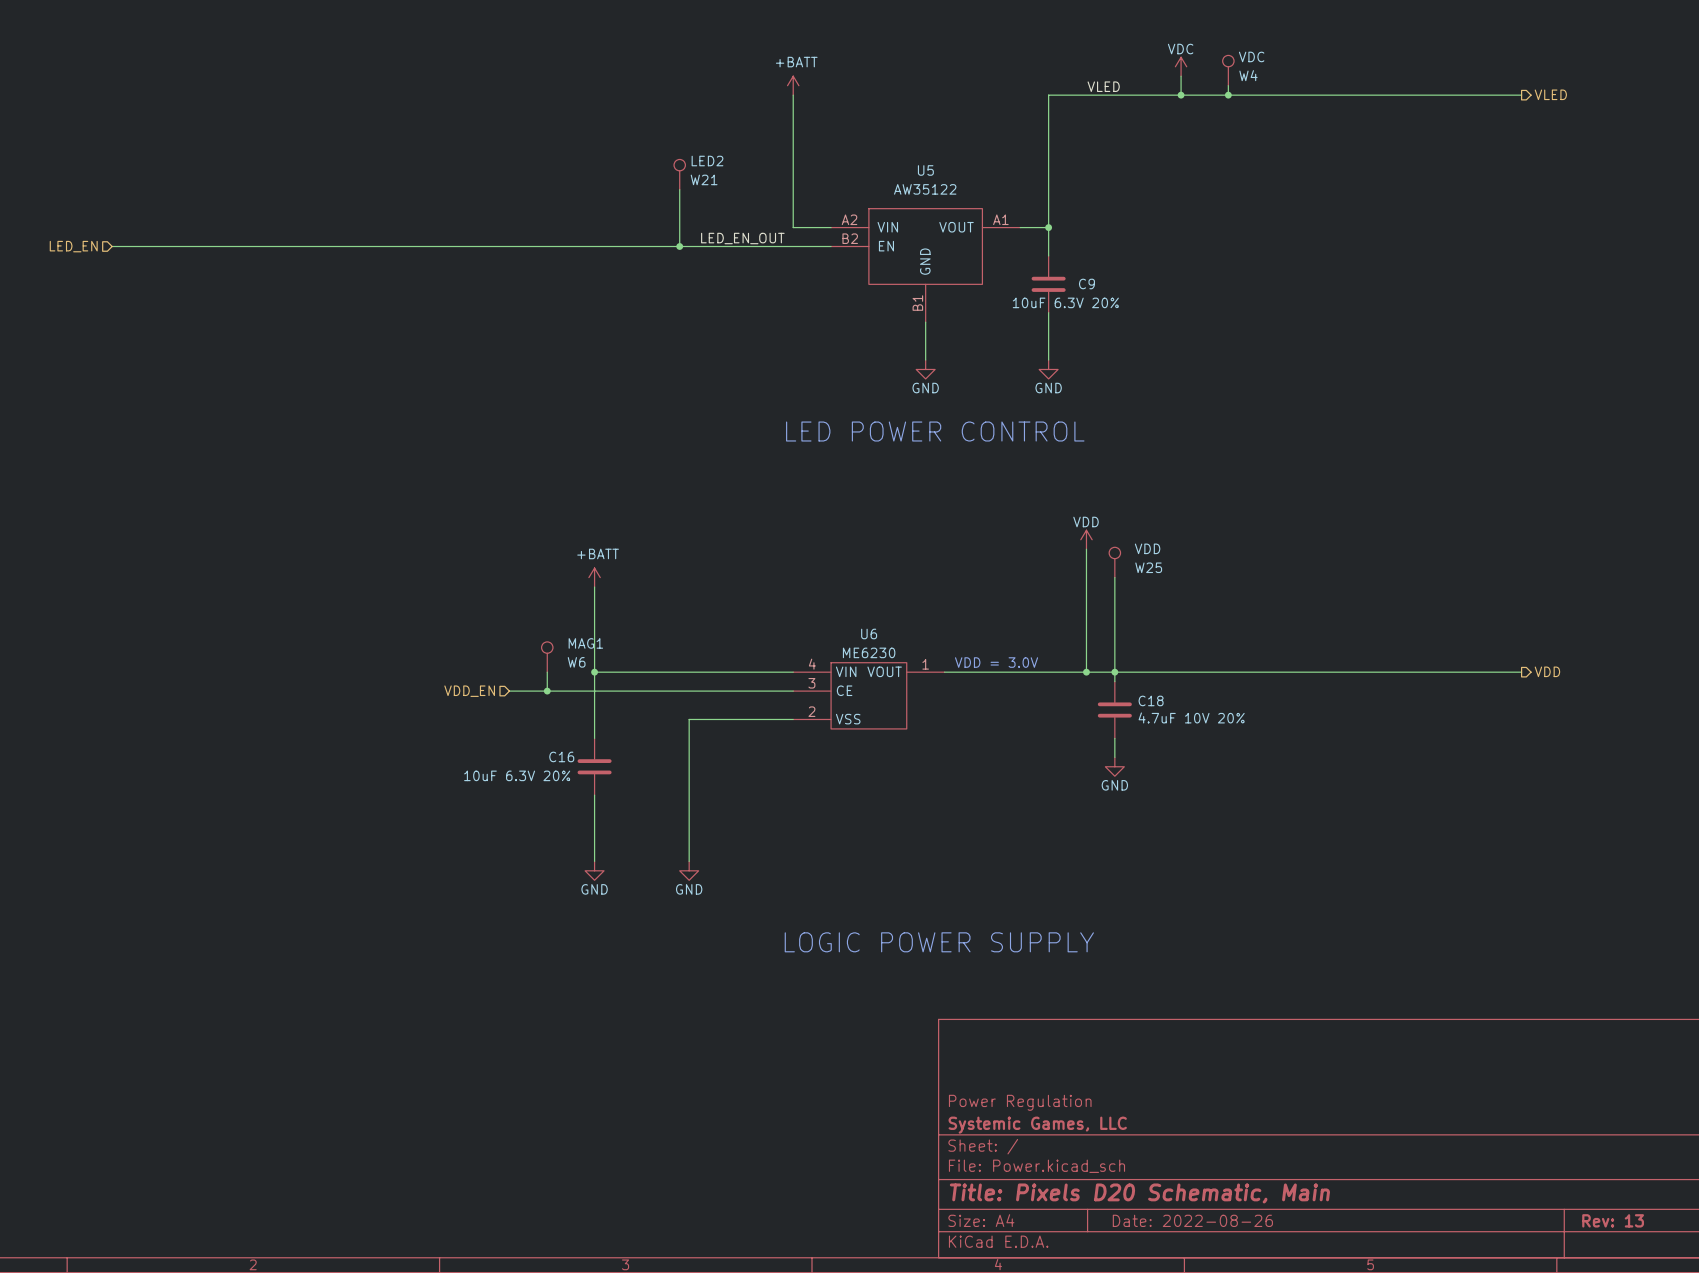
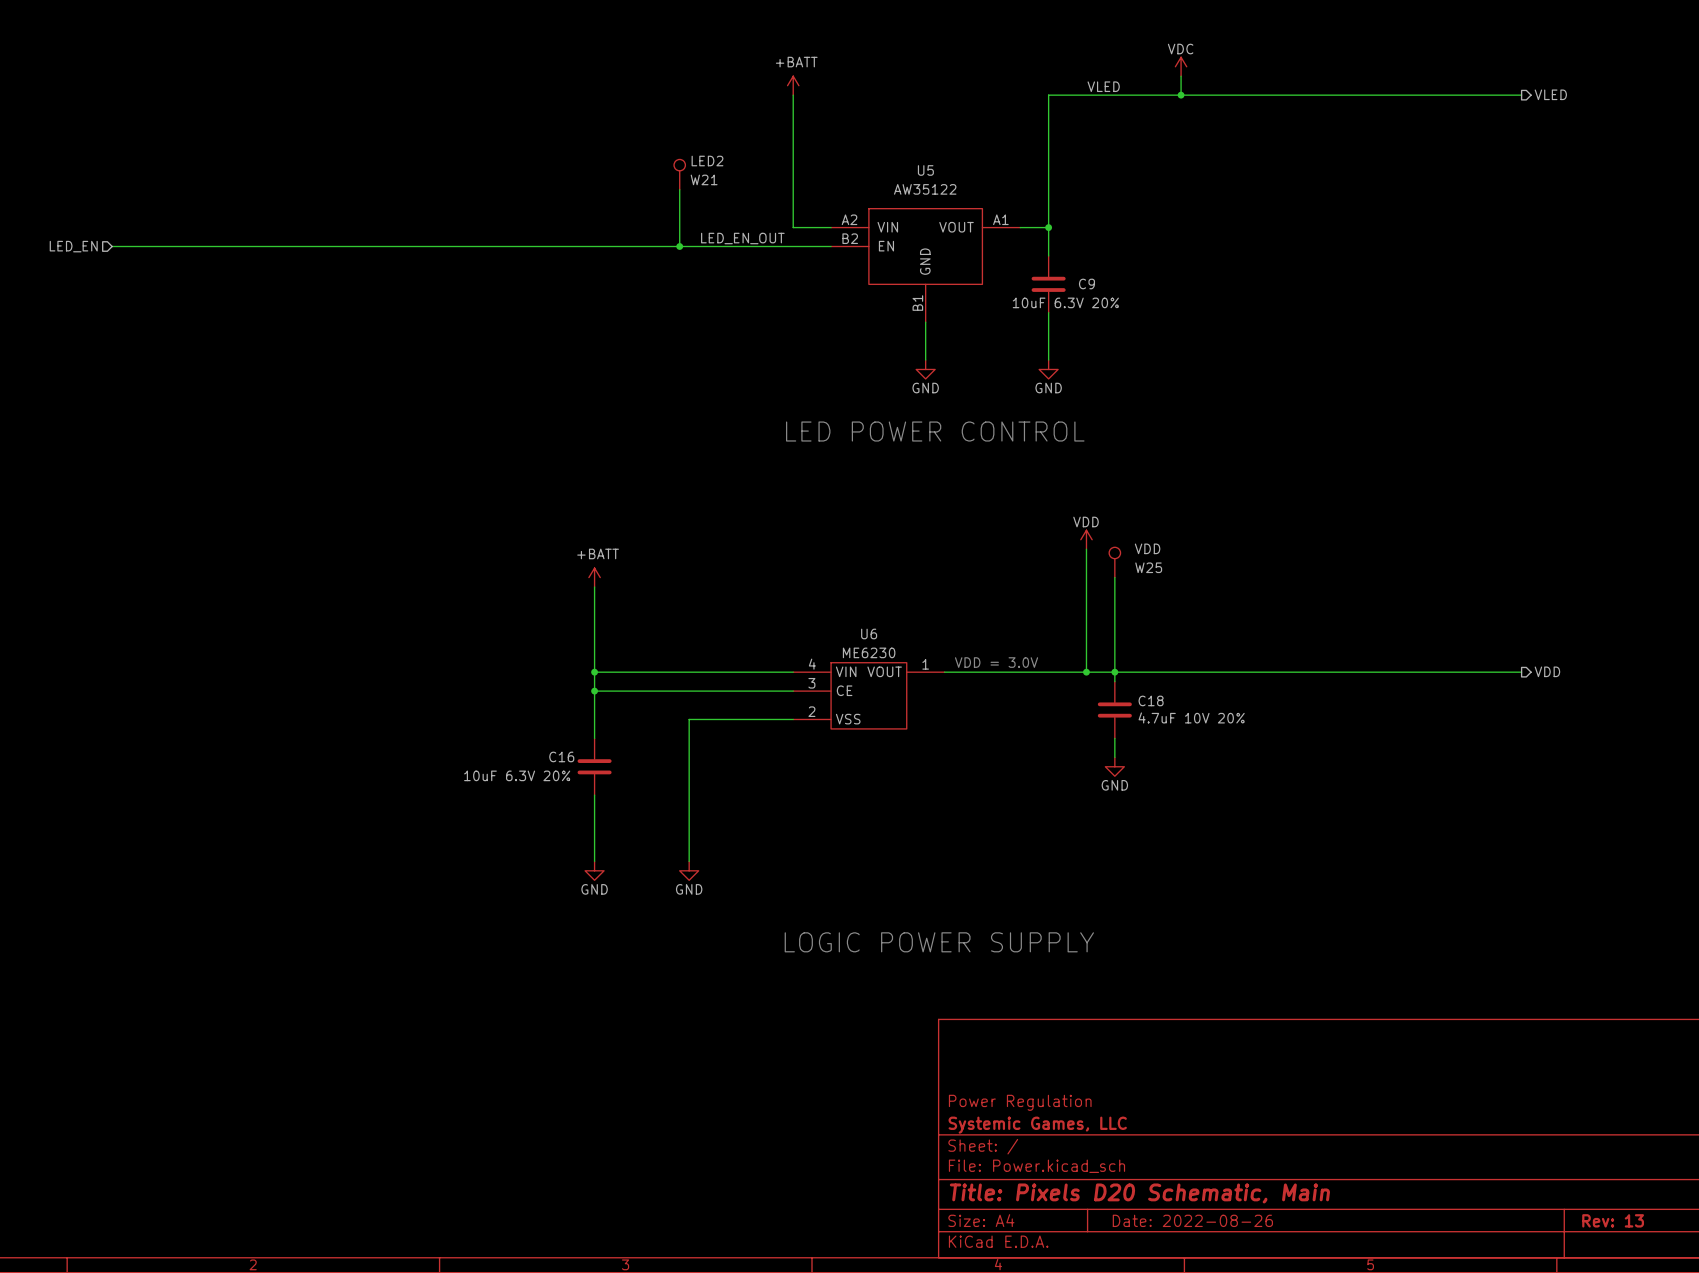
W4: VDC (1228, 70) -> none
wire: (1228, 85) (1228, 95) -> none
junction: (1228, 95) -> none
W6: MAG1 (547, 657) -> none
wire: (547, 672) (547, 691) -> none
hierarchical label: VDD_EN (469, 691) -> none
wire: (509, 691) (594, 691) -> none
junction: (547, 691) -> none
junction: none -> (594, 691)

